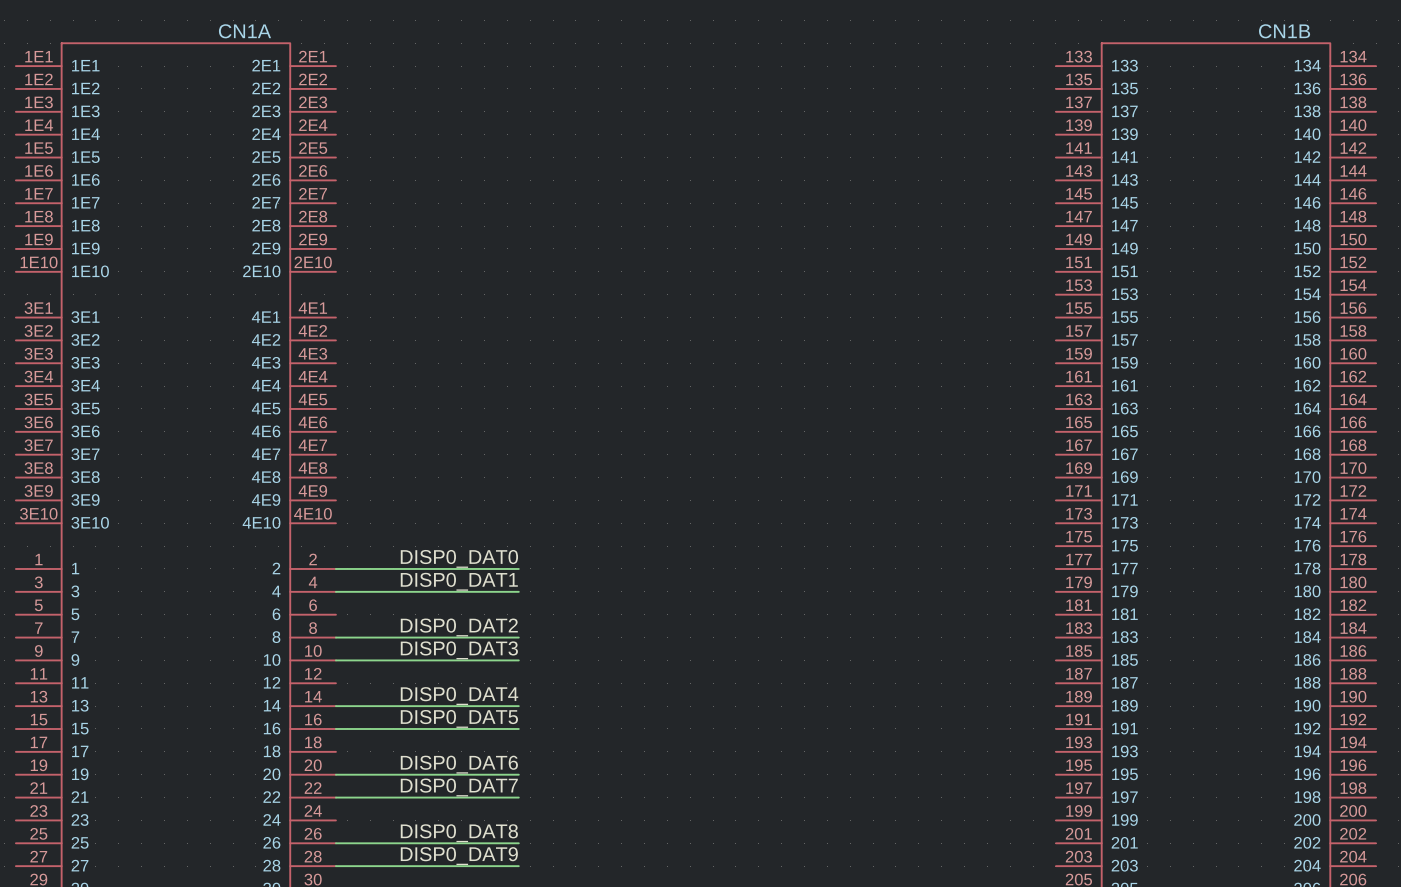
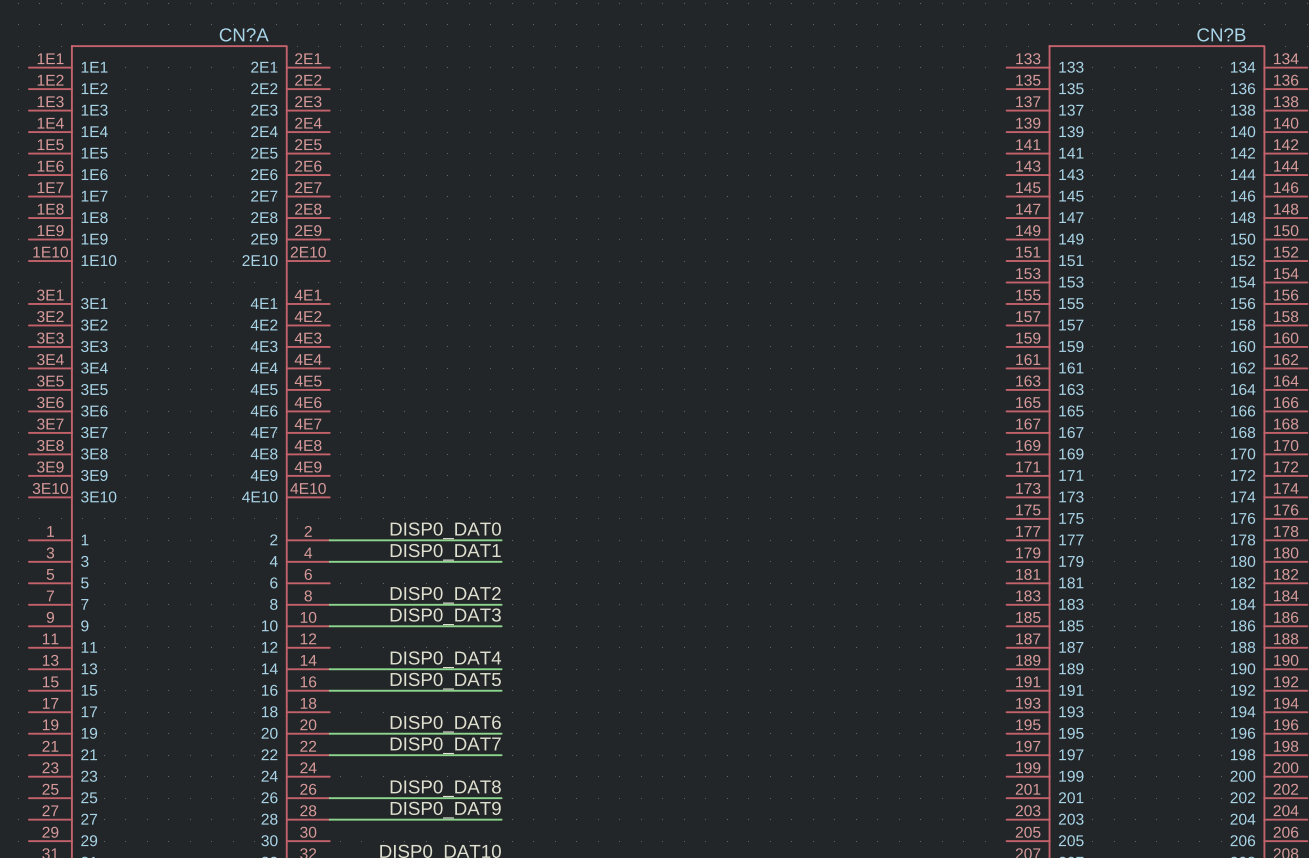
CN1A name: CN1A (244, 31) -> CN?A (244, 34)
CN1B name: CN1B (1284, 31) -> CN?B (1221, 34)

